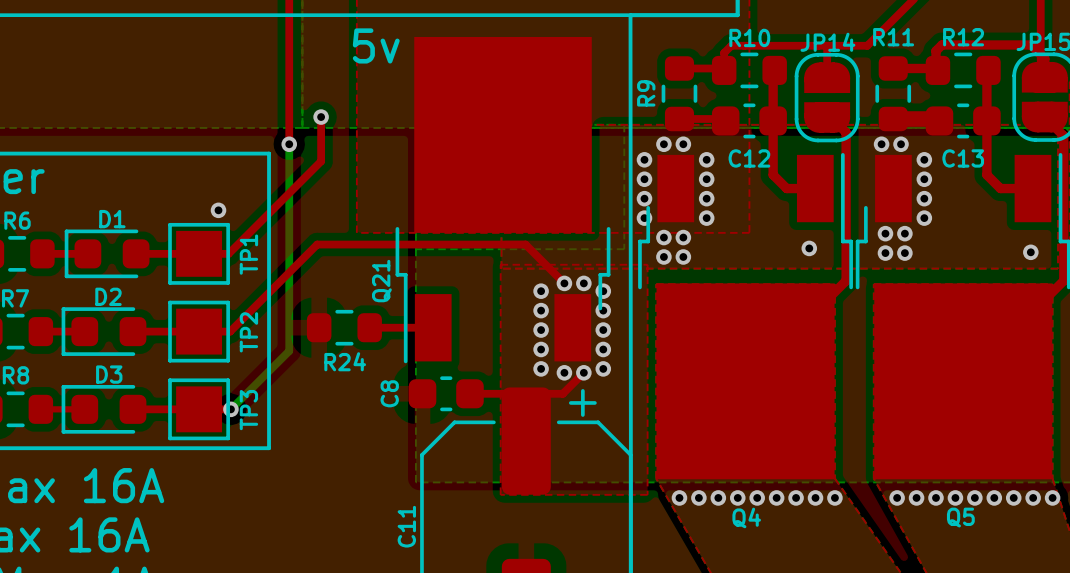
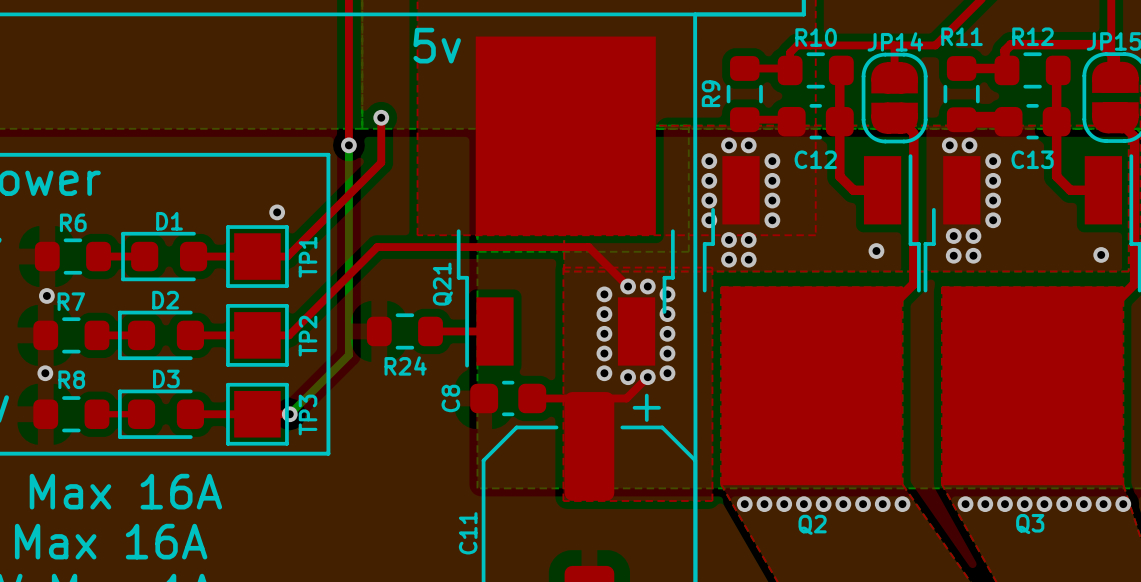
Q4 name: Q4 (746, 517) -> Q2 (812, 524)
Q5 name: Q5 (960, 517) -> Q3 (1030, 524)

